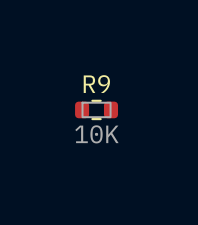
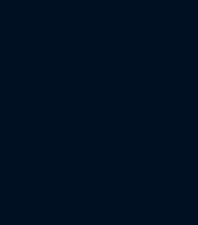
R9: 10K (96, 109) -> none

